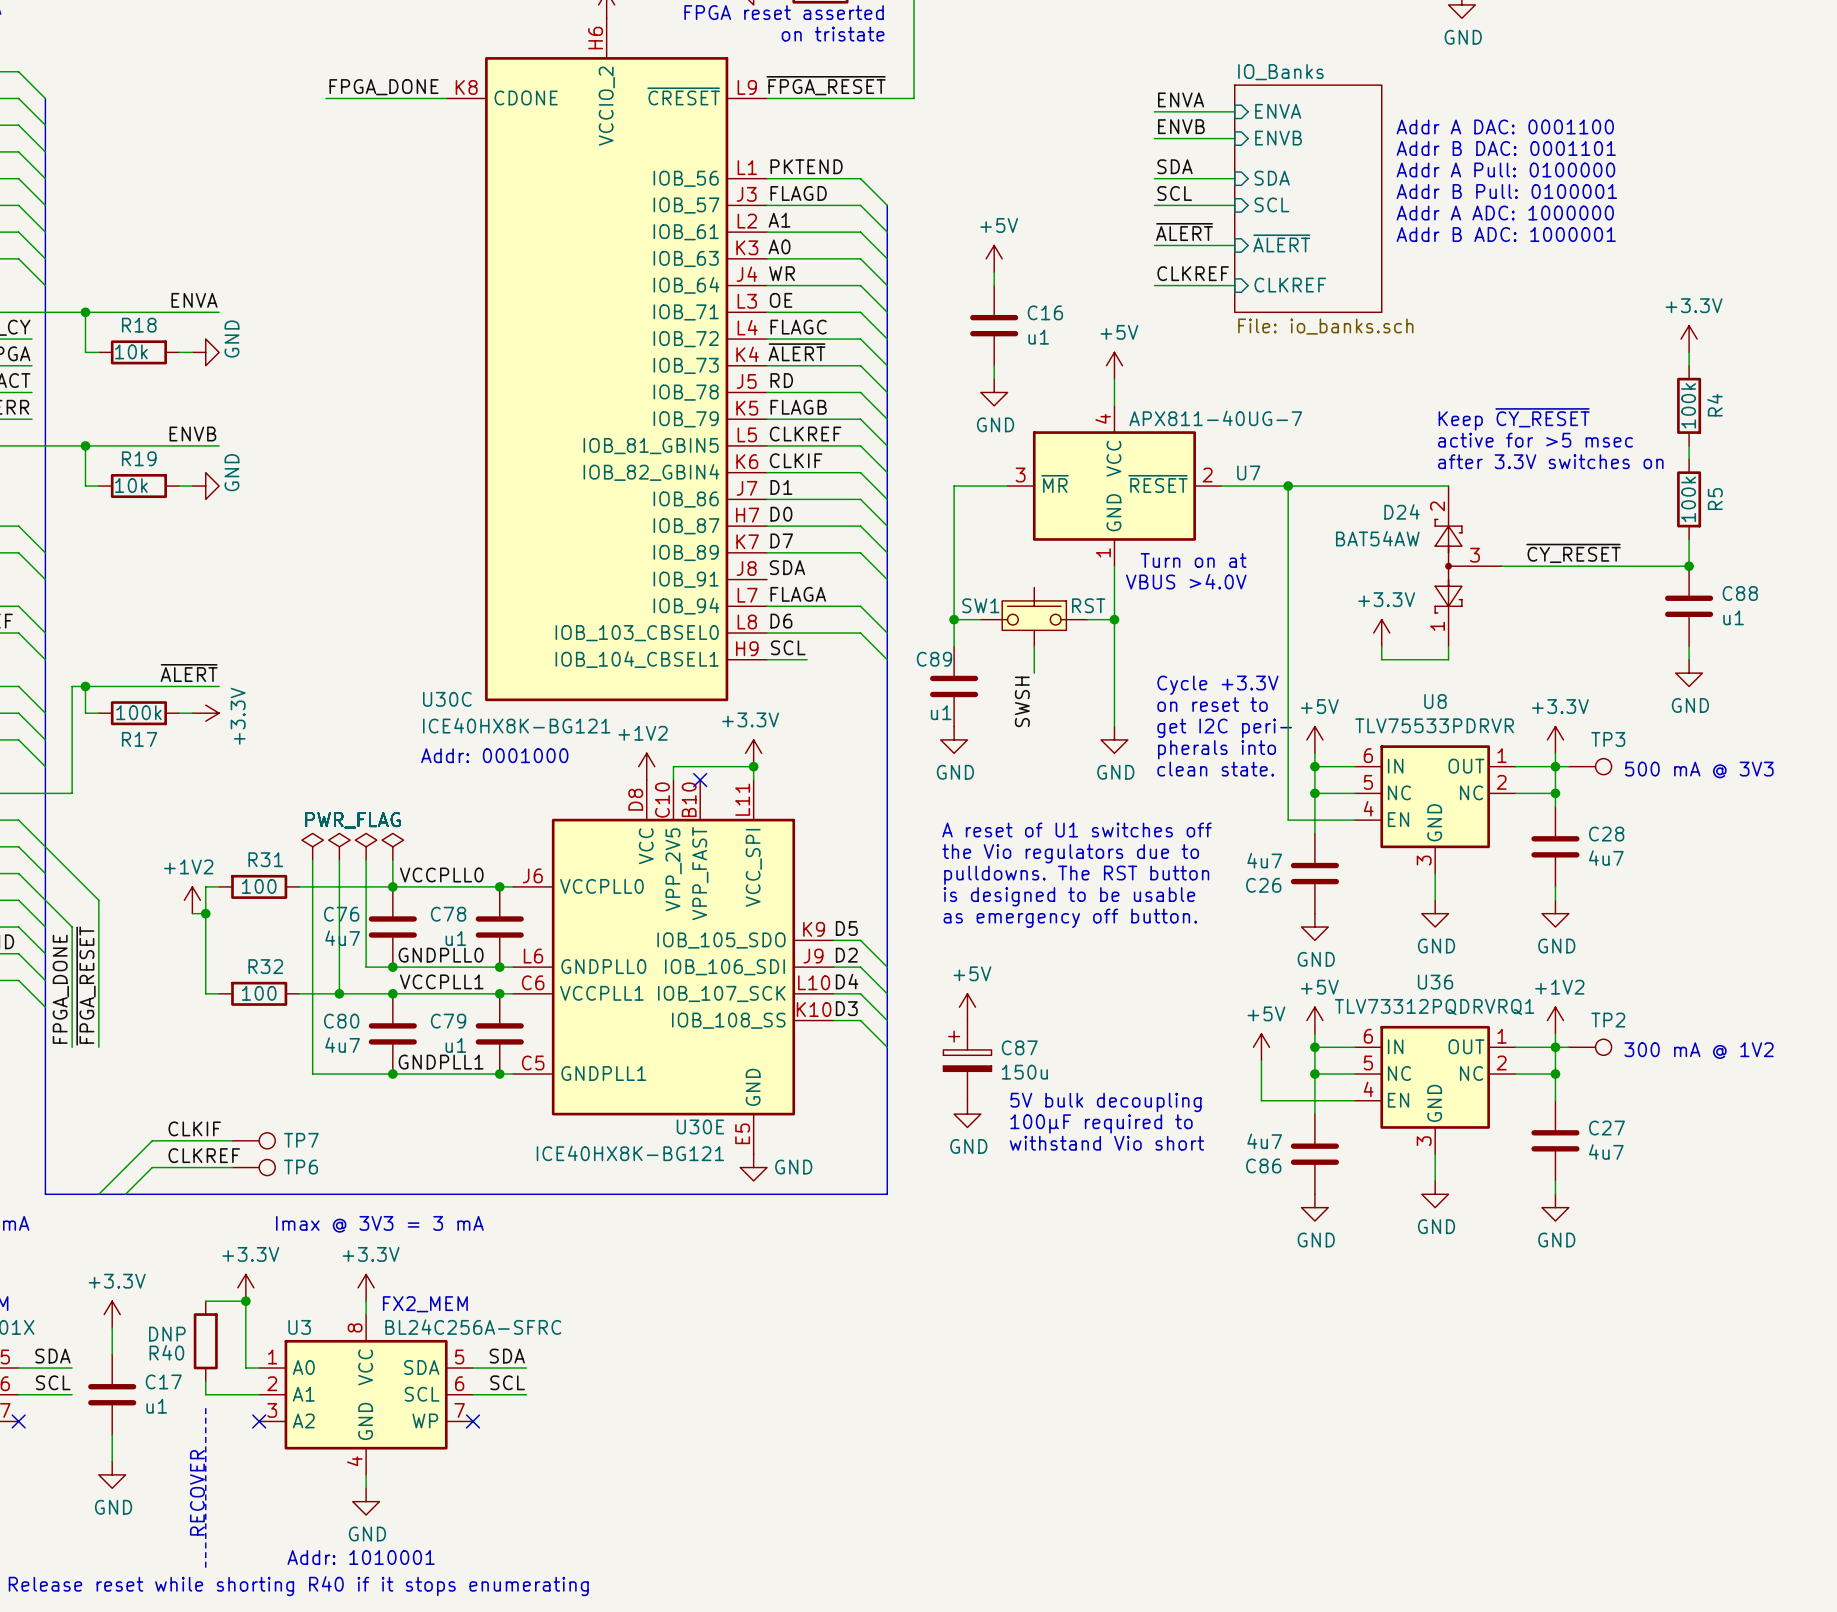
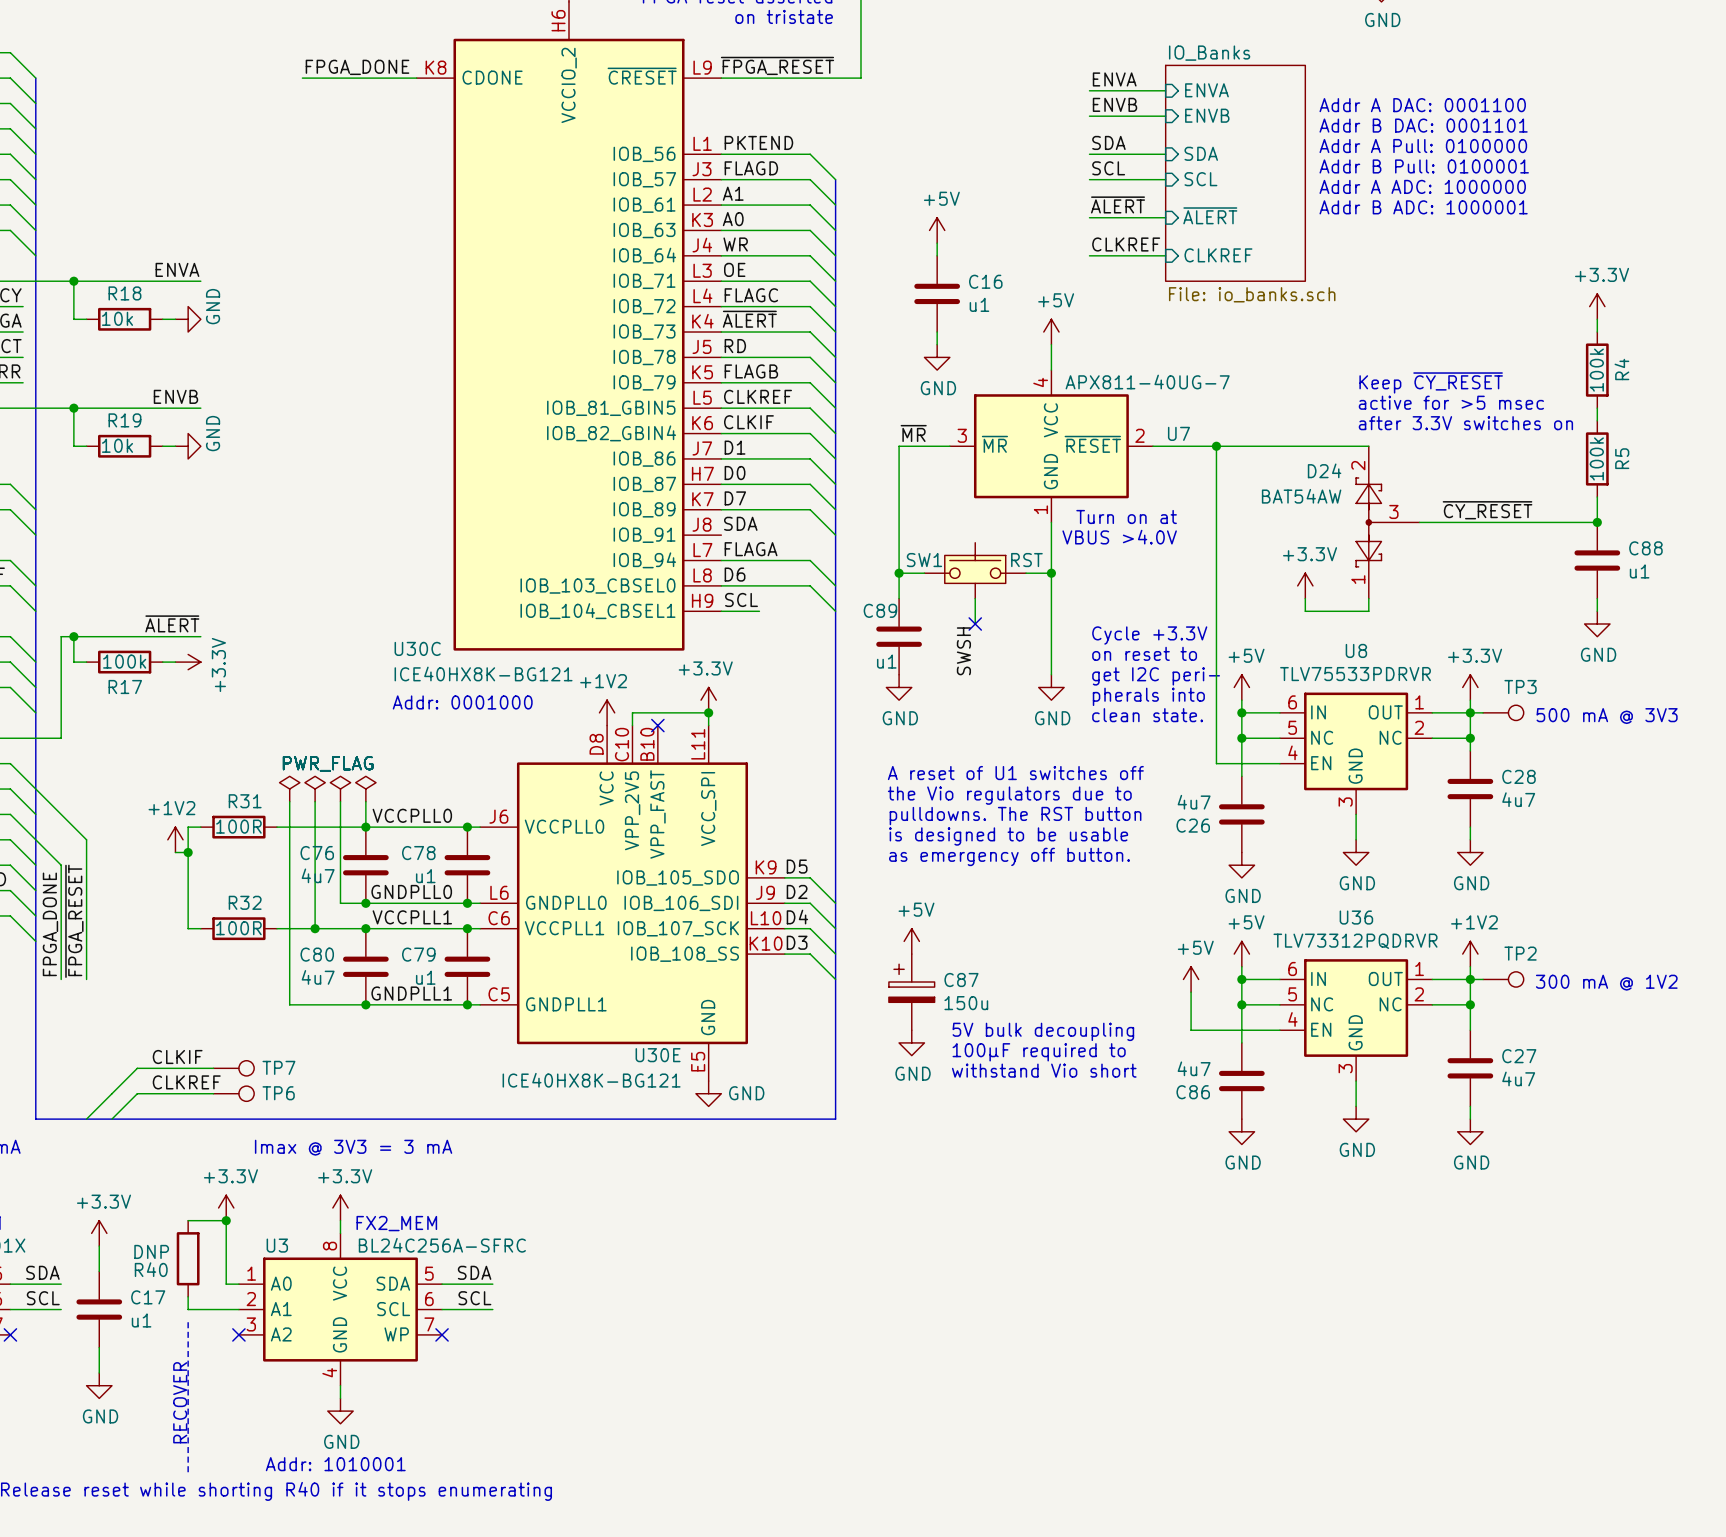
label: none -> ~{MR} (913, 433)
no-connect mark: none -> (975, 623)
R31 value: 100 (259, 886) -> 100R (238, 826)
R32 value: 100 (259, 993) -> 100R (238, 928)
U36 value: TLV73312PQDRVRQ1 (1434, 1007) -> TLV73312PQDRVR (1355, 941)

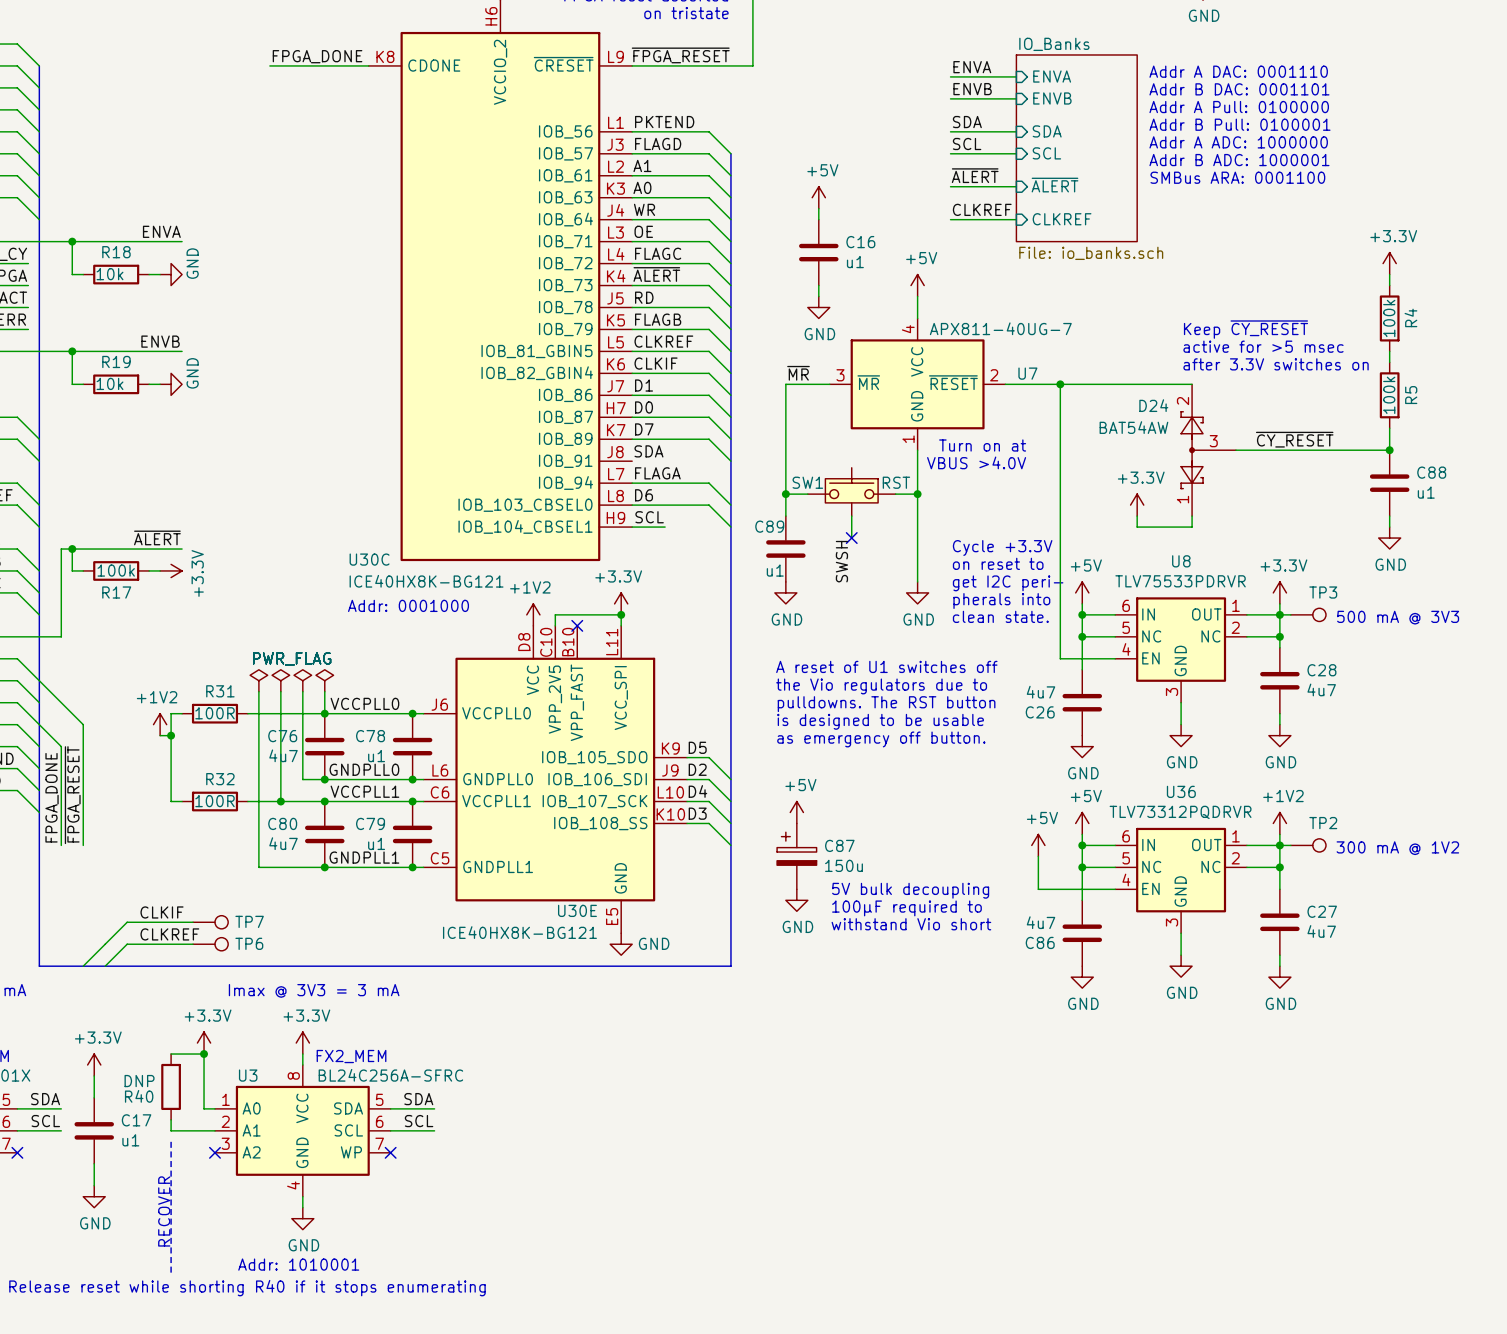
text: none -> Addr A DAC: 0001110 (1238, 71)
text: Addr A DAC: 0001100 (1422, 105) -> Addr B DAC: 0001101 (1239, 89)
text: Addr B DAC: 0001101 (1423, 125) -> Addr A Pull: 0100000 (1239, 107)
text: Addr A Pull: 0100000 (1423, 146) -> Addr B Pull: 0100001 (1239, 124)
text: Addr B Pull: 0100001 (1424, 166) -> Addr A ADC: 1000000 (1238, 142)
text: Addr A ADC: 1000000 (1422, 186) -> Addr B ADC: 1000001 (1239, 160)
text: Addr B ADC: 1000001 (1423, 207) -> SMBus ARA: 0001100 (1237, 177)

